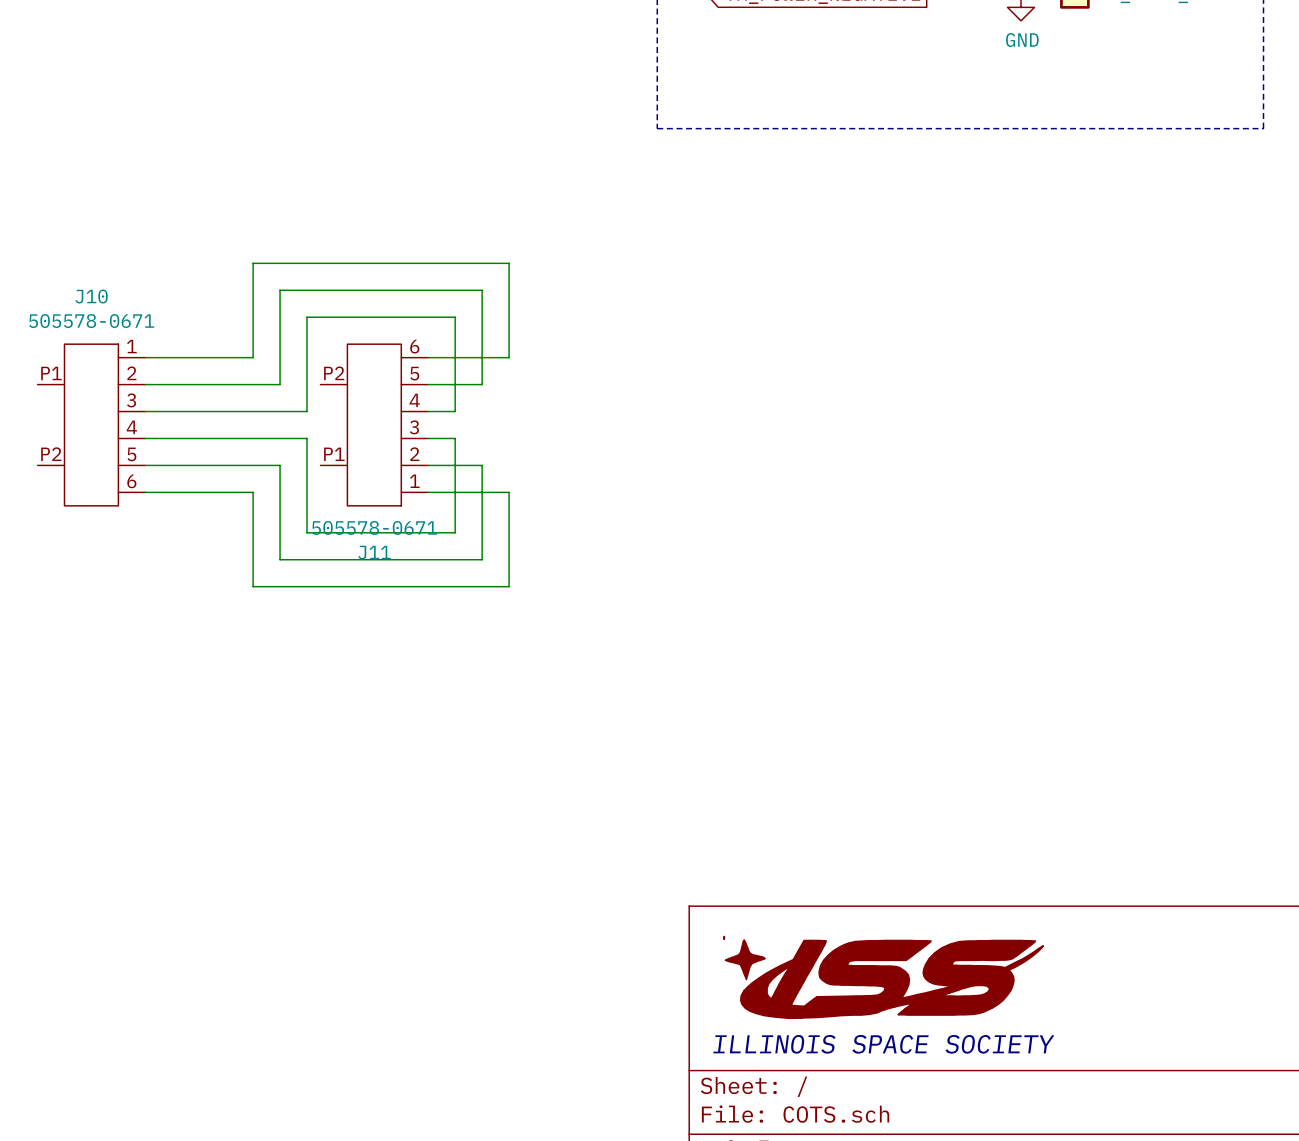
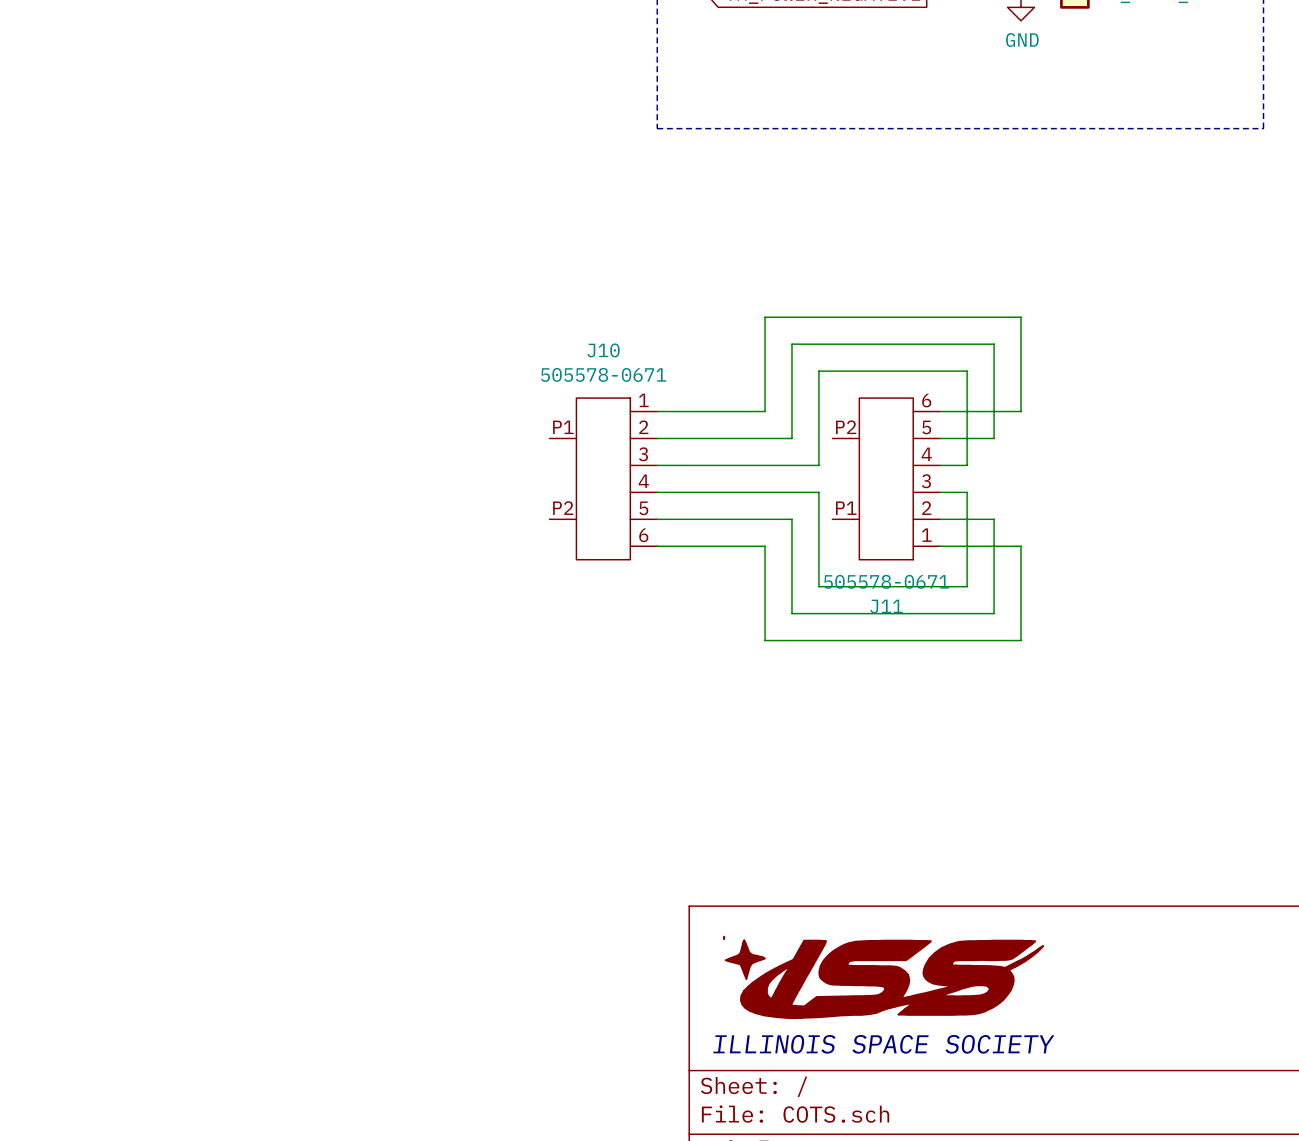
wire: (145, 357) (253, 357) (253, 263) (509, 263) (509, 357) (428, 357) -> none
wire: (145, 384) (280, 384) (280, 290) (482, 290) (482, 384) (428, 384) -> none
wire: (145, 411) (306, 411) (306, 317) (455, 317) (455, 411) (428, 411) -> none
wire: none -> (657, 411) (765, 411) (765, 317) (1021, 317) (1021, 411) (940, 411)
J10 position: (91, 425) -> (603, 478)
J11 position: (374, 425) -> (886, 478)
wire: (145, 438) (306, 438) (306, 532) (455, 532) (455, 438) (428, 438) -> none
wire: none -> (657, 438) (791, 438) (791, 344) (994, 344) (994, 438) (940, 438)
wire: (145, 465) (280, 465) (280, 559) (482, 559) (482, 465) (428, 465) -> none
wire: none -> (657, 465) (818, 465) (818, 371) (967, 371) (967, 465) (940, 465)
wire: (145, 492) (253, 492) (253, 586) (509, 586) (509, 492) (428, 492) -> none
wire: none -> (657, 492) (818, 492) (818, 586) (967, 586) (967, 492) (940, 492)
wire: none -> (657, 519) (791, 519) (791, 613) (994, 613) (994, 519) (940, 519)
wire: none -> (657, 546) (765, 546) (765, 640) (1021, 640) (1021, 546) (940, 546)

